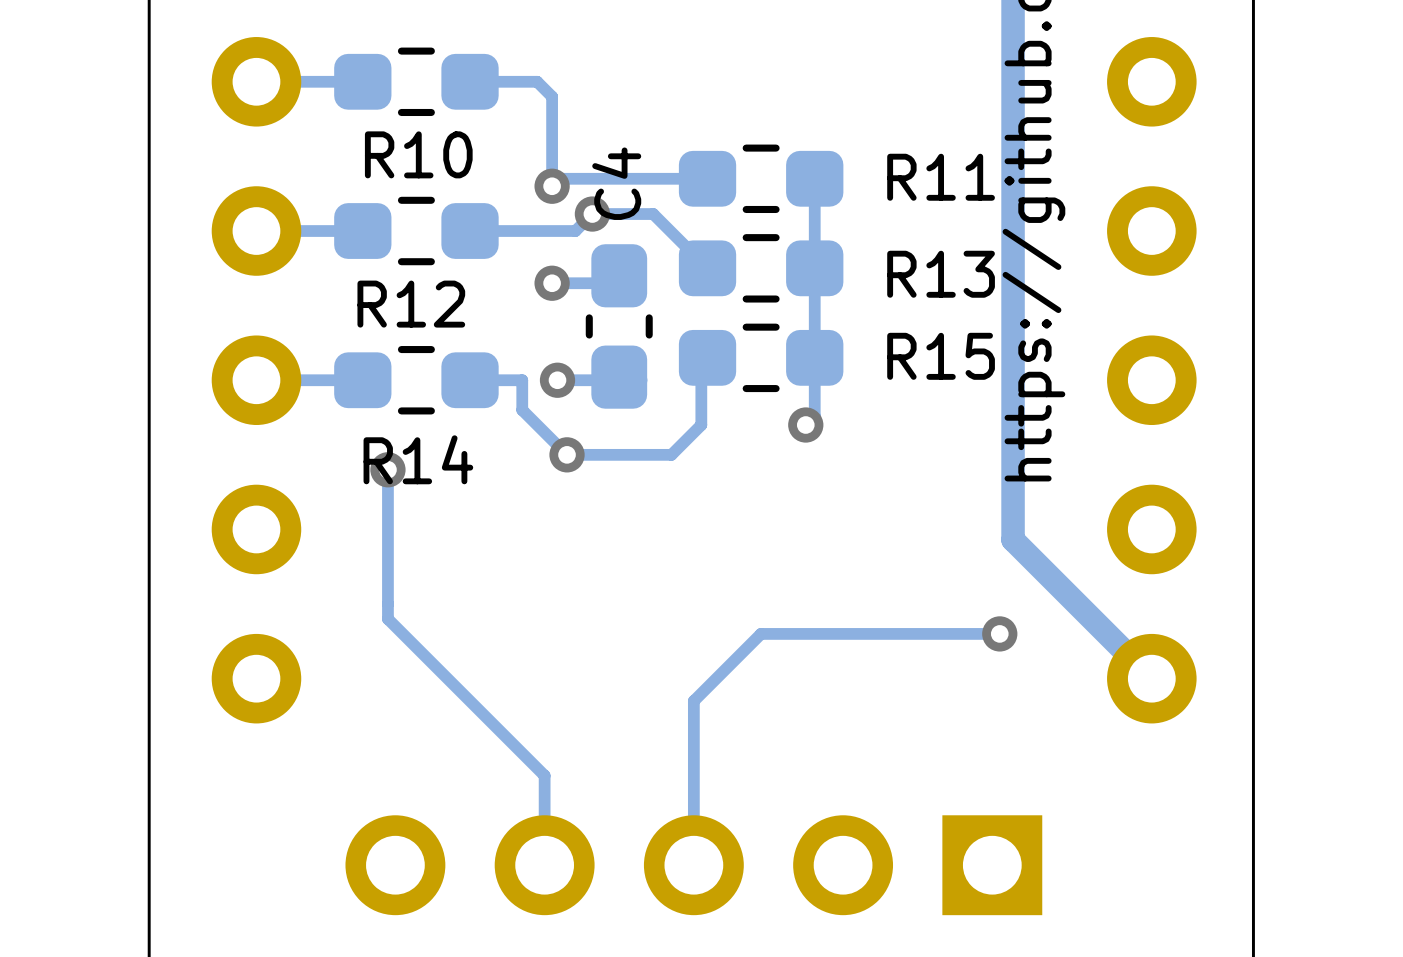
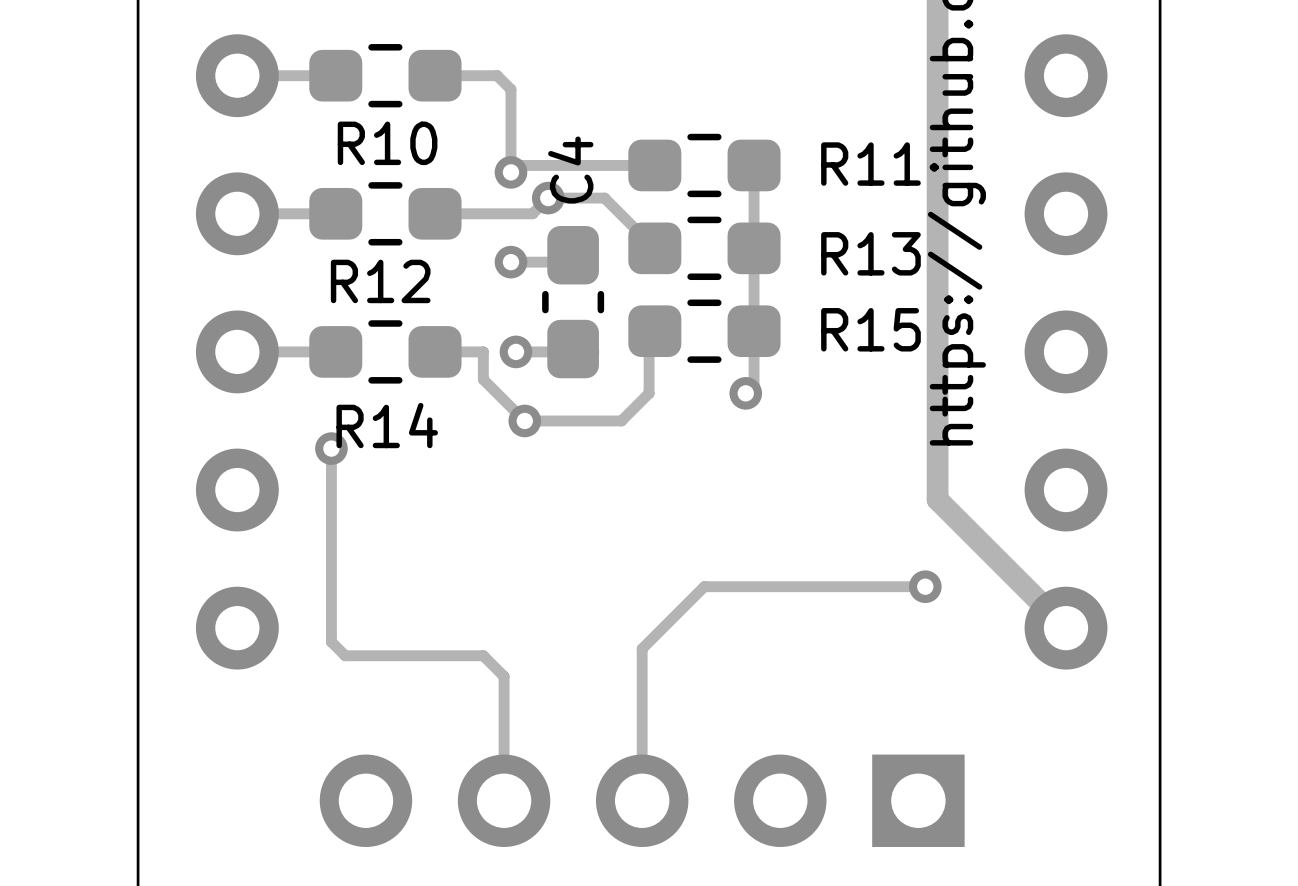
track: (387, 469) (387, 619) (544, 775) -> (331, 448) (331, 641) (345, 655) (483, 655) (504, 676) (504, 717)
via position: (387, 469) -> (331, 448)

